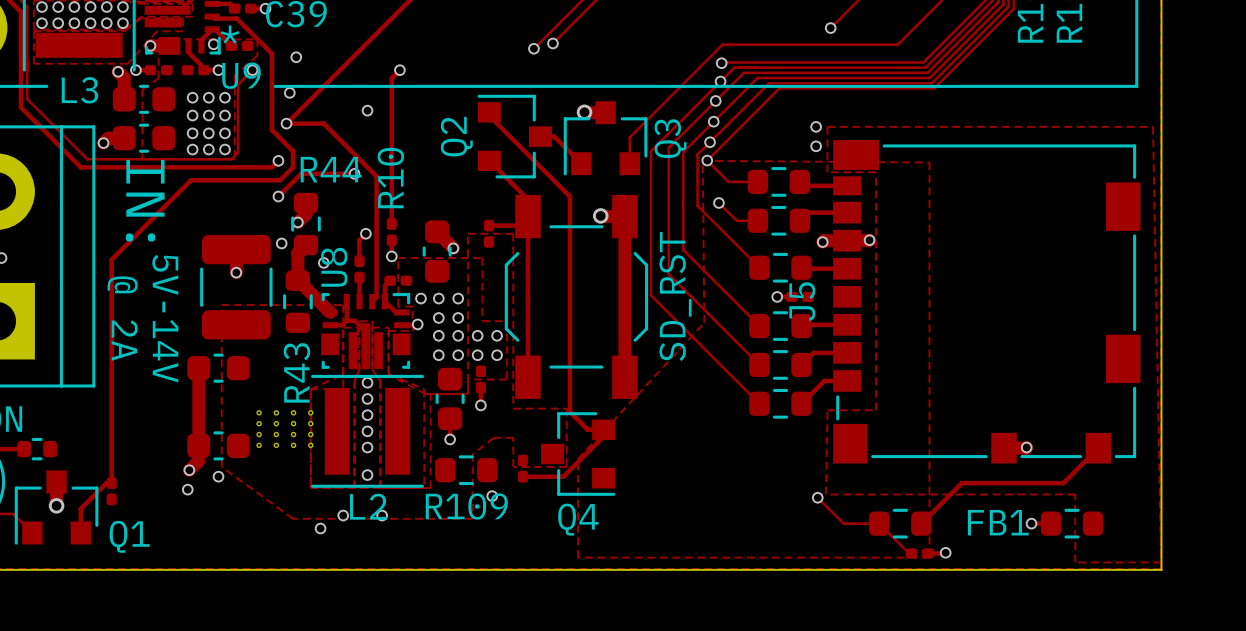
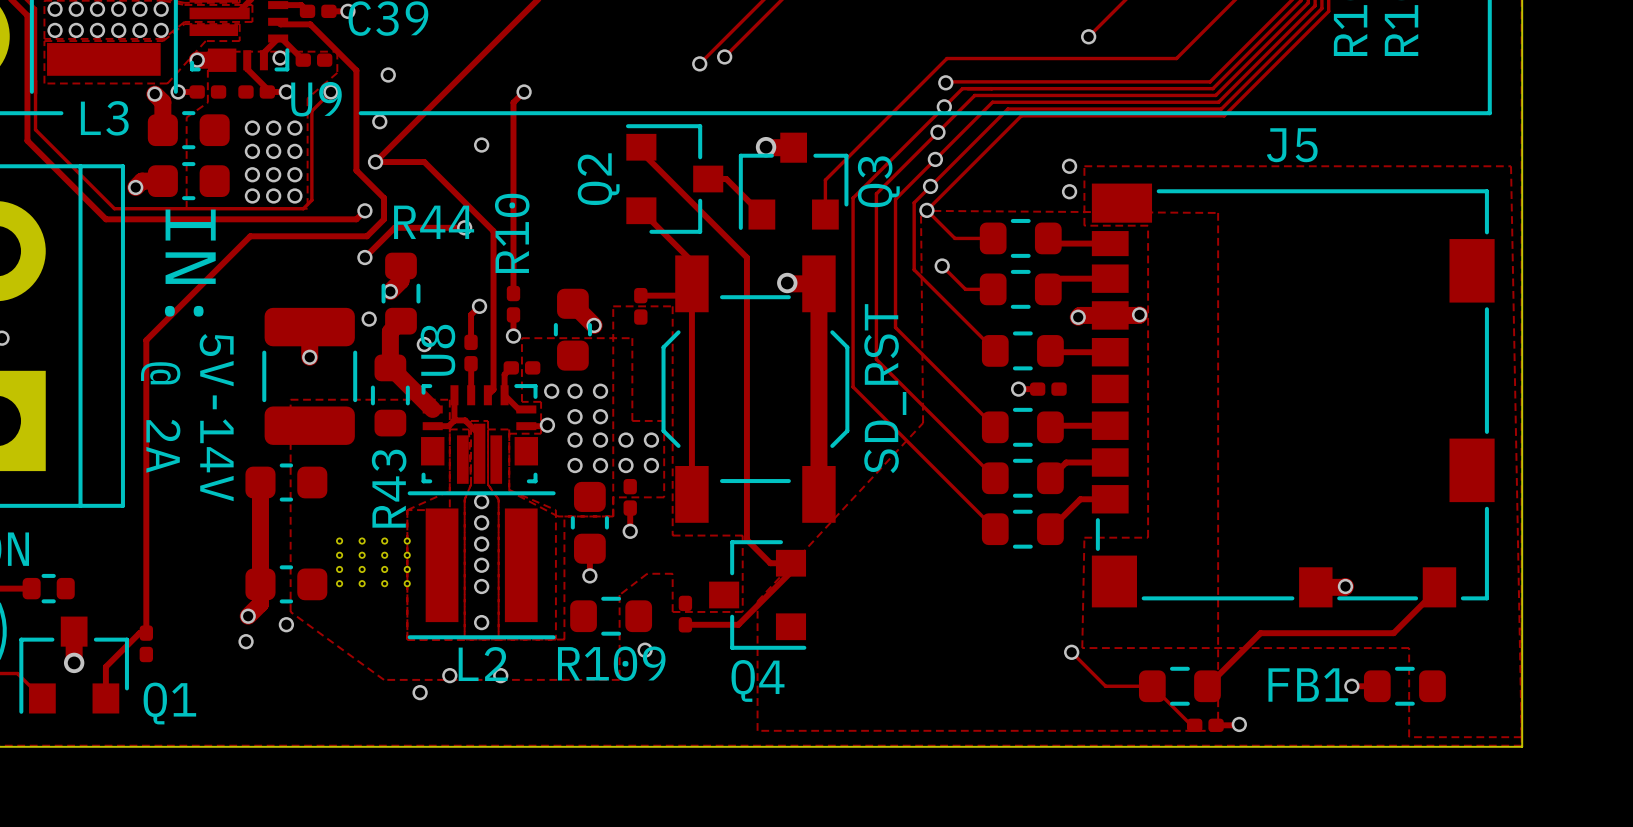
U9 text: * (230, 34) -> none
J5 name rotation: 0° (802, 301) -> 90° clockwise (1292, 145)
J5 name position: J5 (802, 301) -> J5 (1292, 145)

